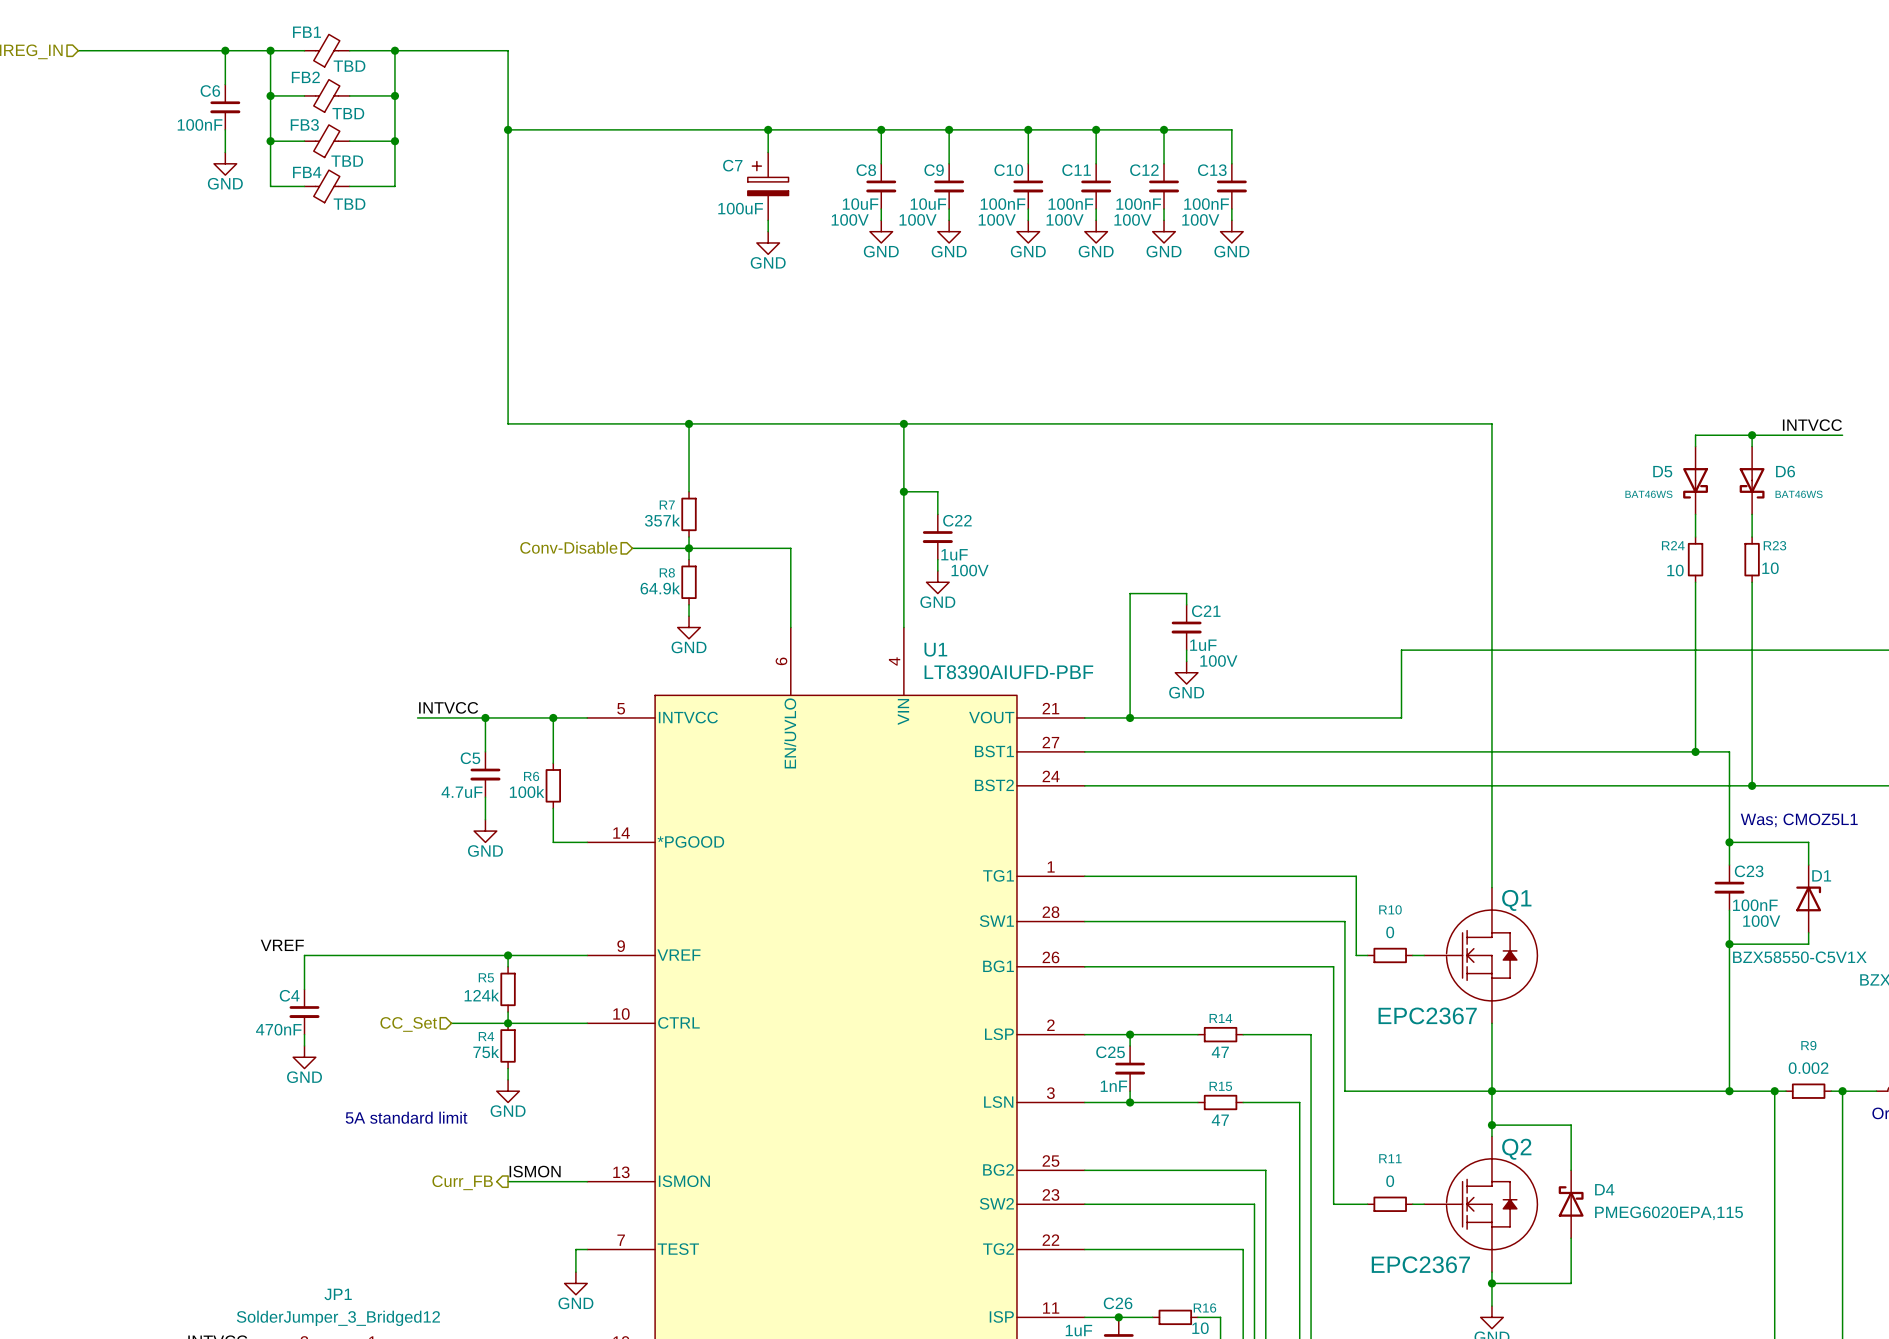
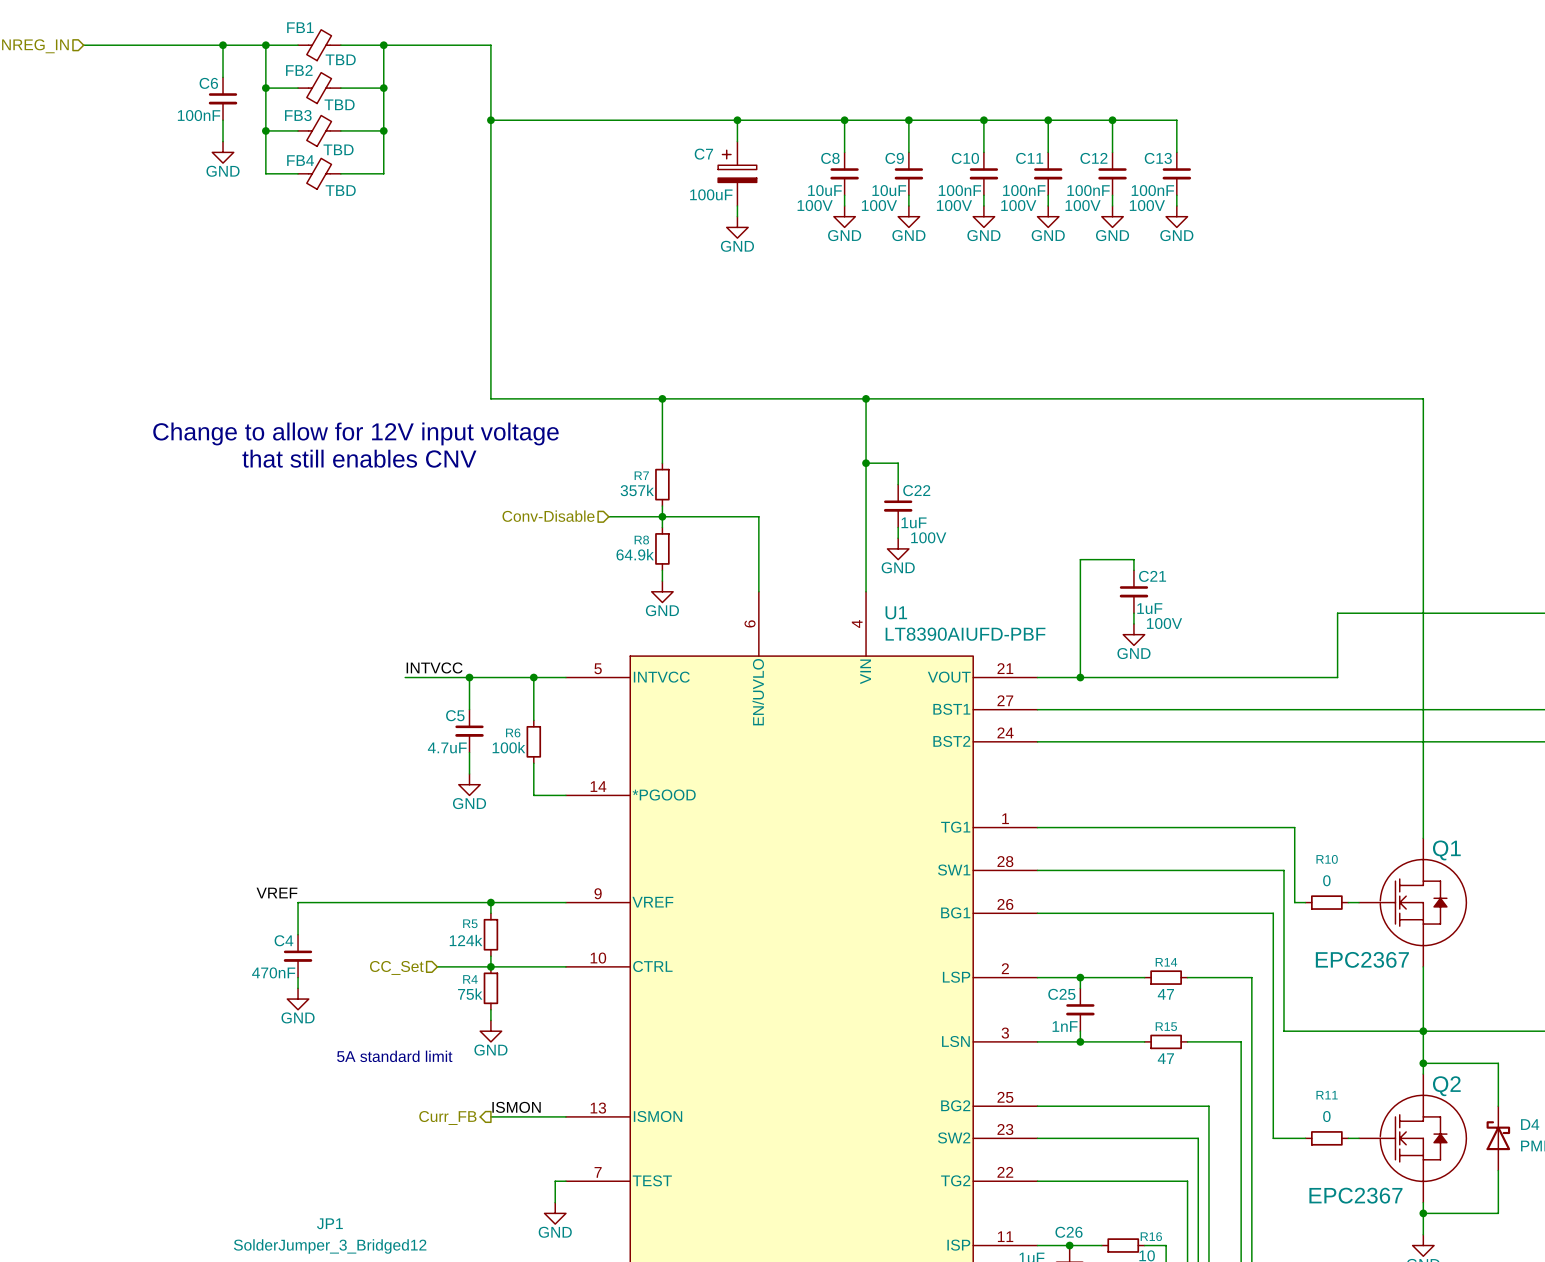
text: none -> Change to allow for 12V input voltage (355, 433)
text: none -> that still enables CNV (359, 458)

